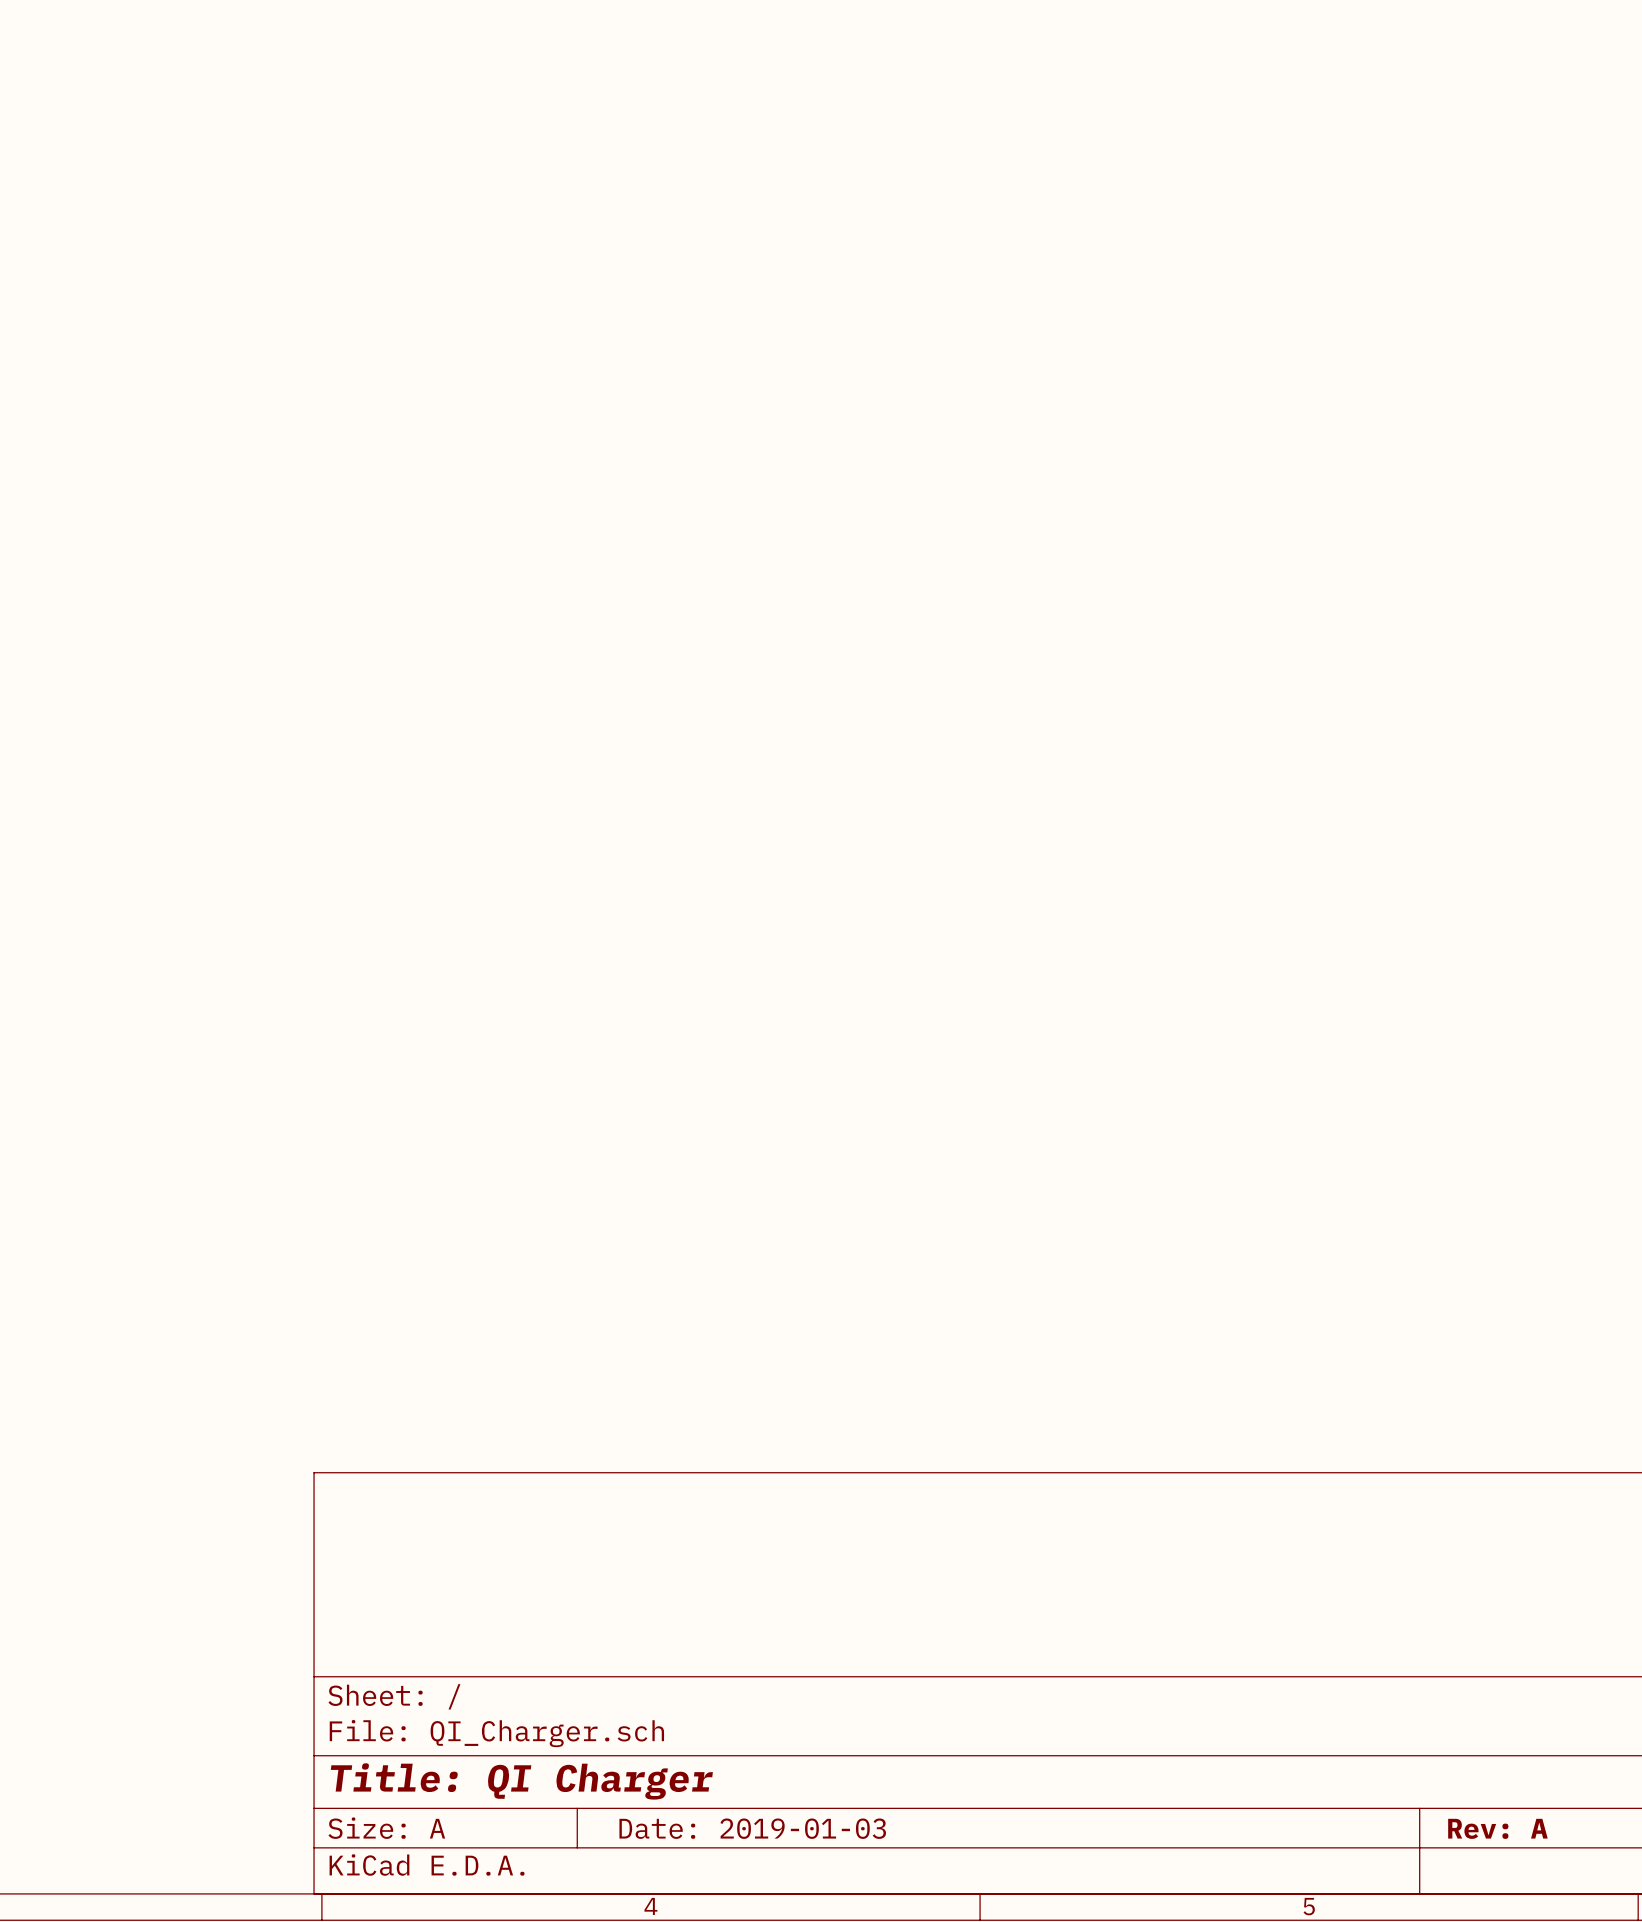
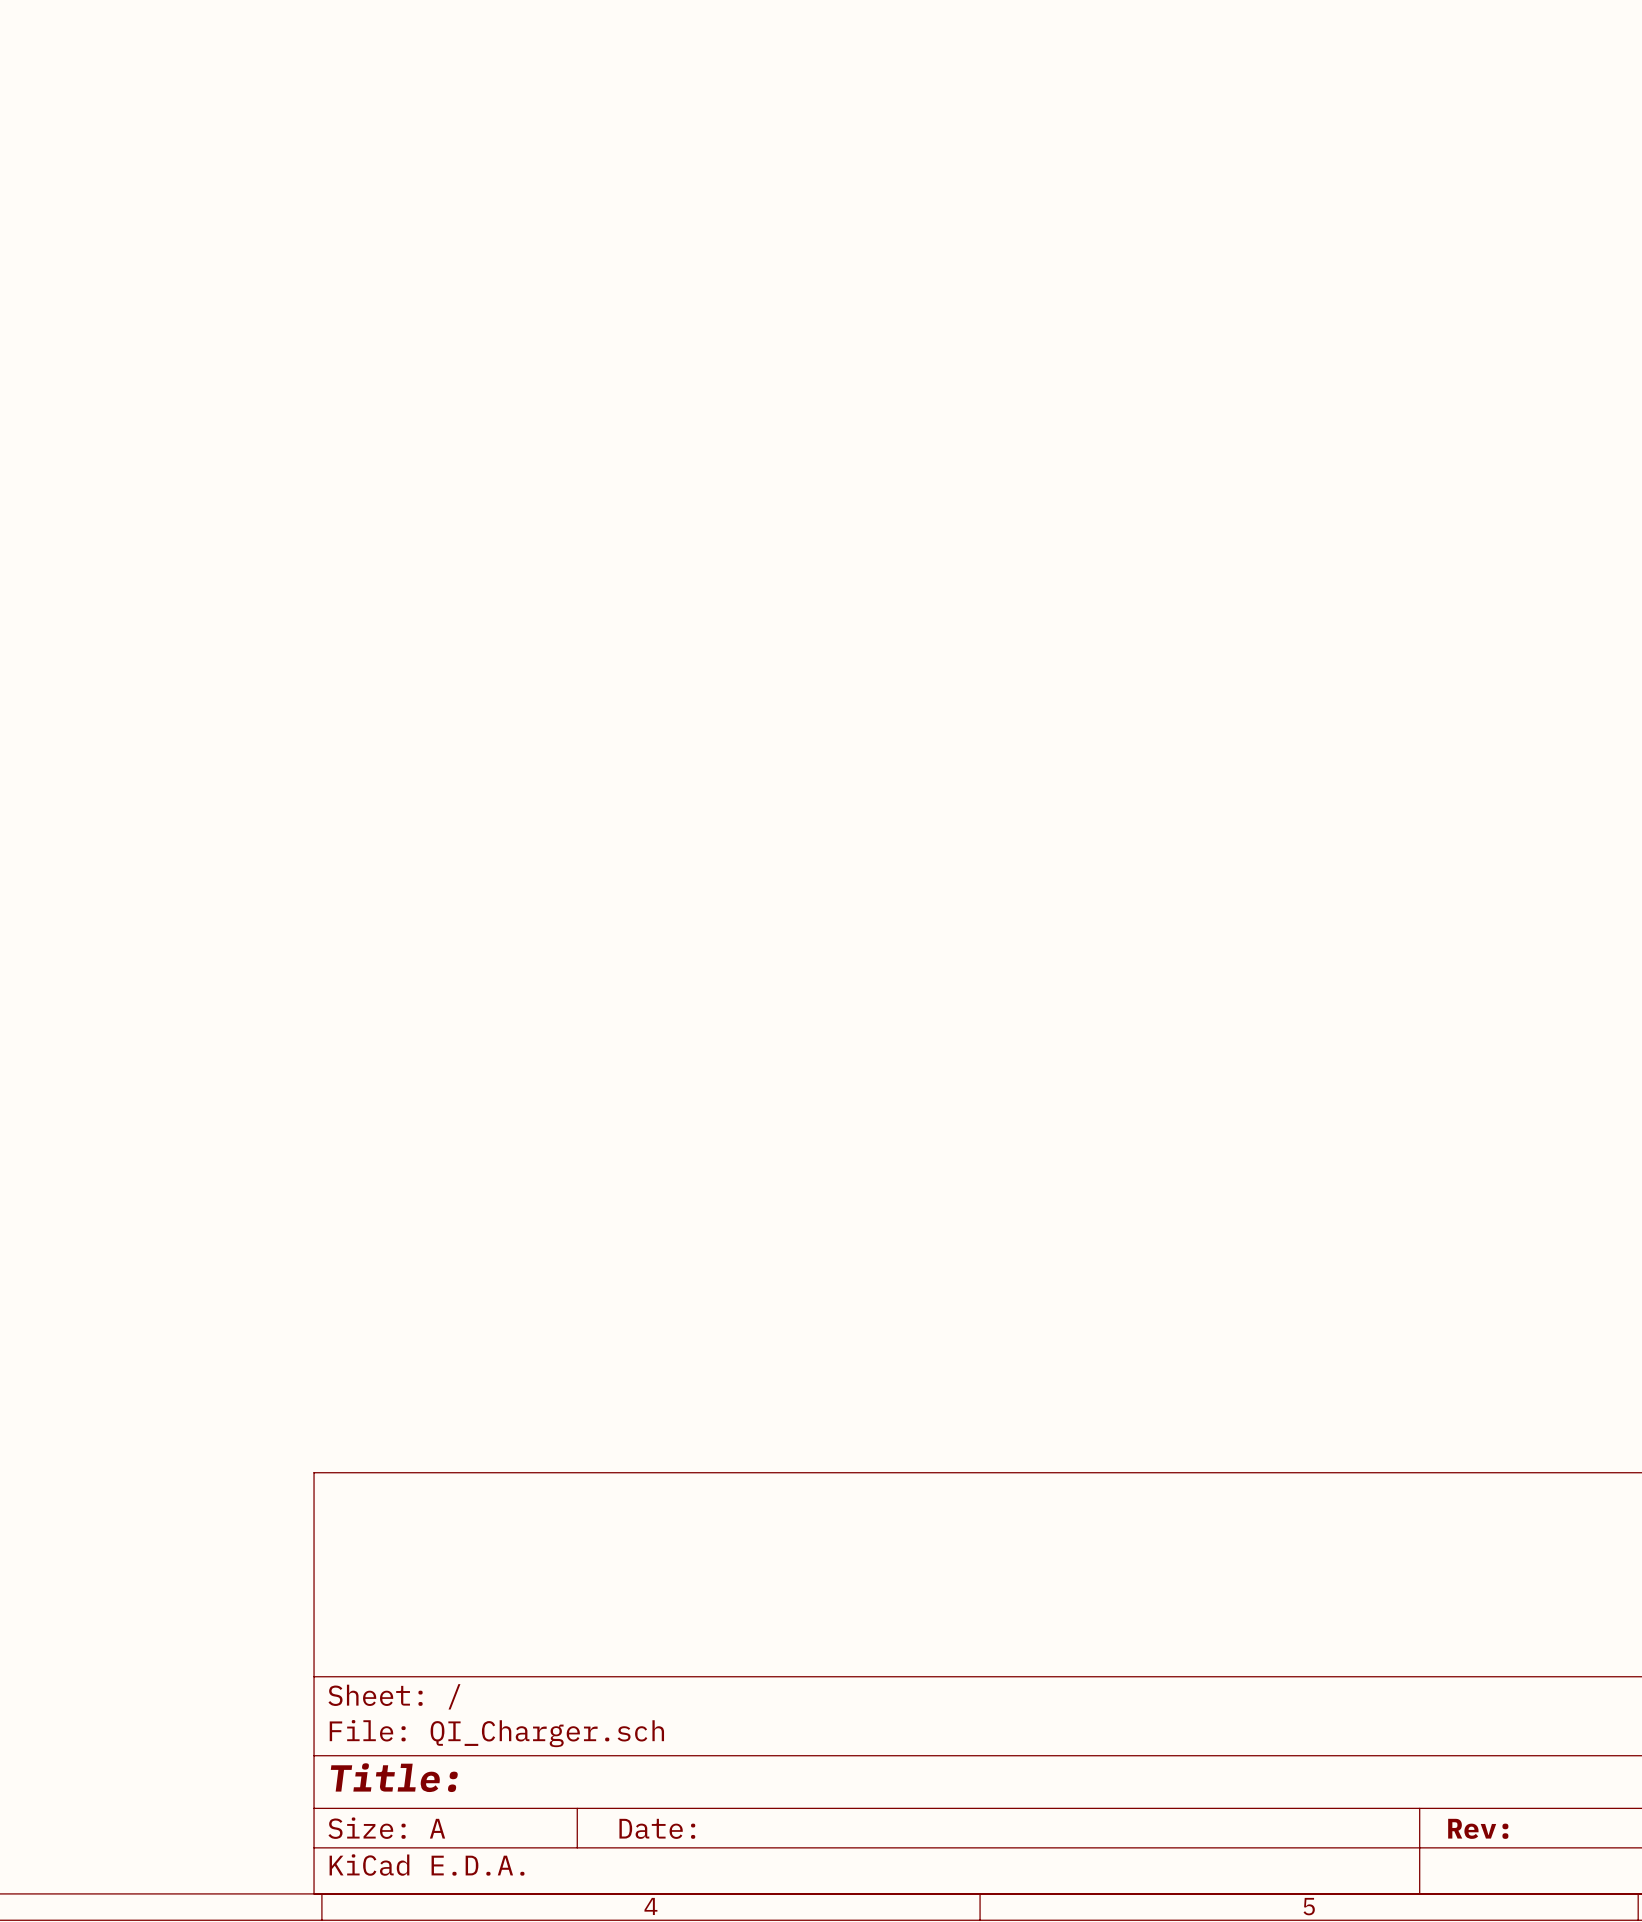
title block: Title: QI Charger (521, 1781) -> Title: (394, 1777)
title block: Date: 2019-01-03 (752, 1828) -> Date: (657, 1828)
title block: Rev: A (1497, 1828) -> Rev: (1478, 1828)

